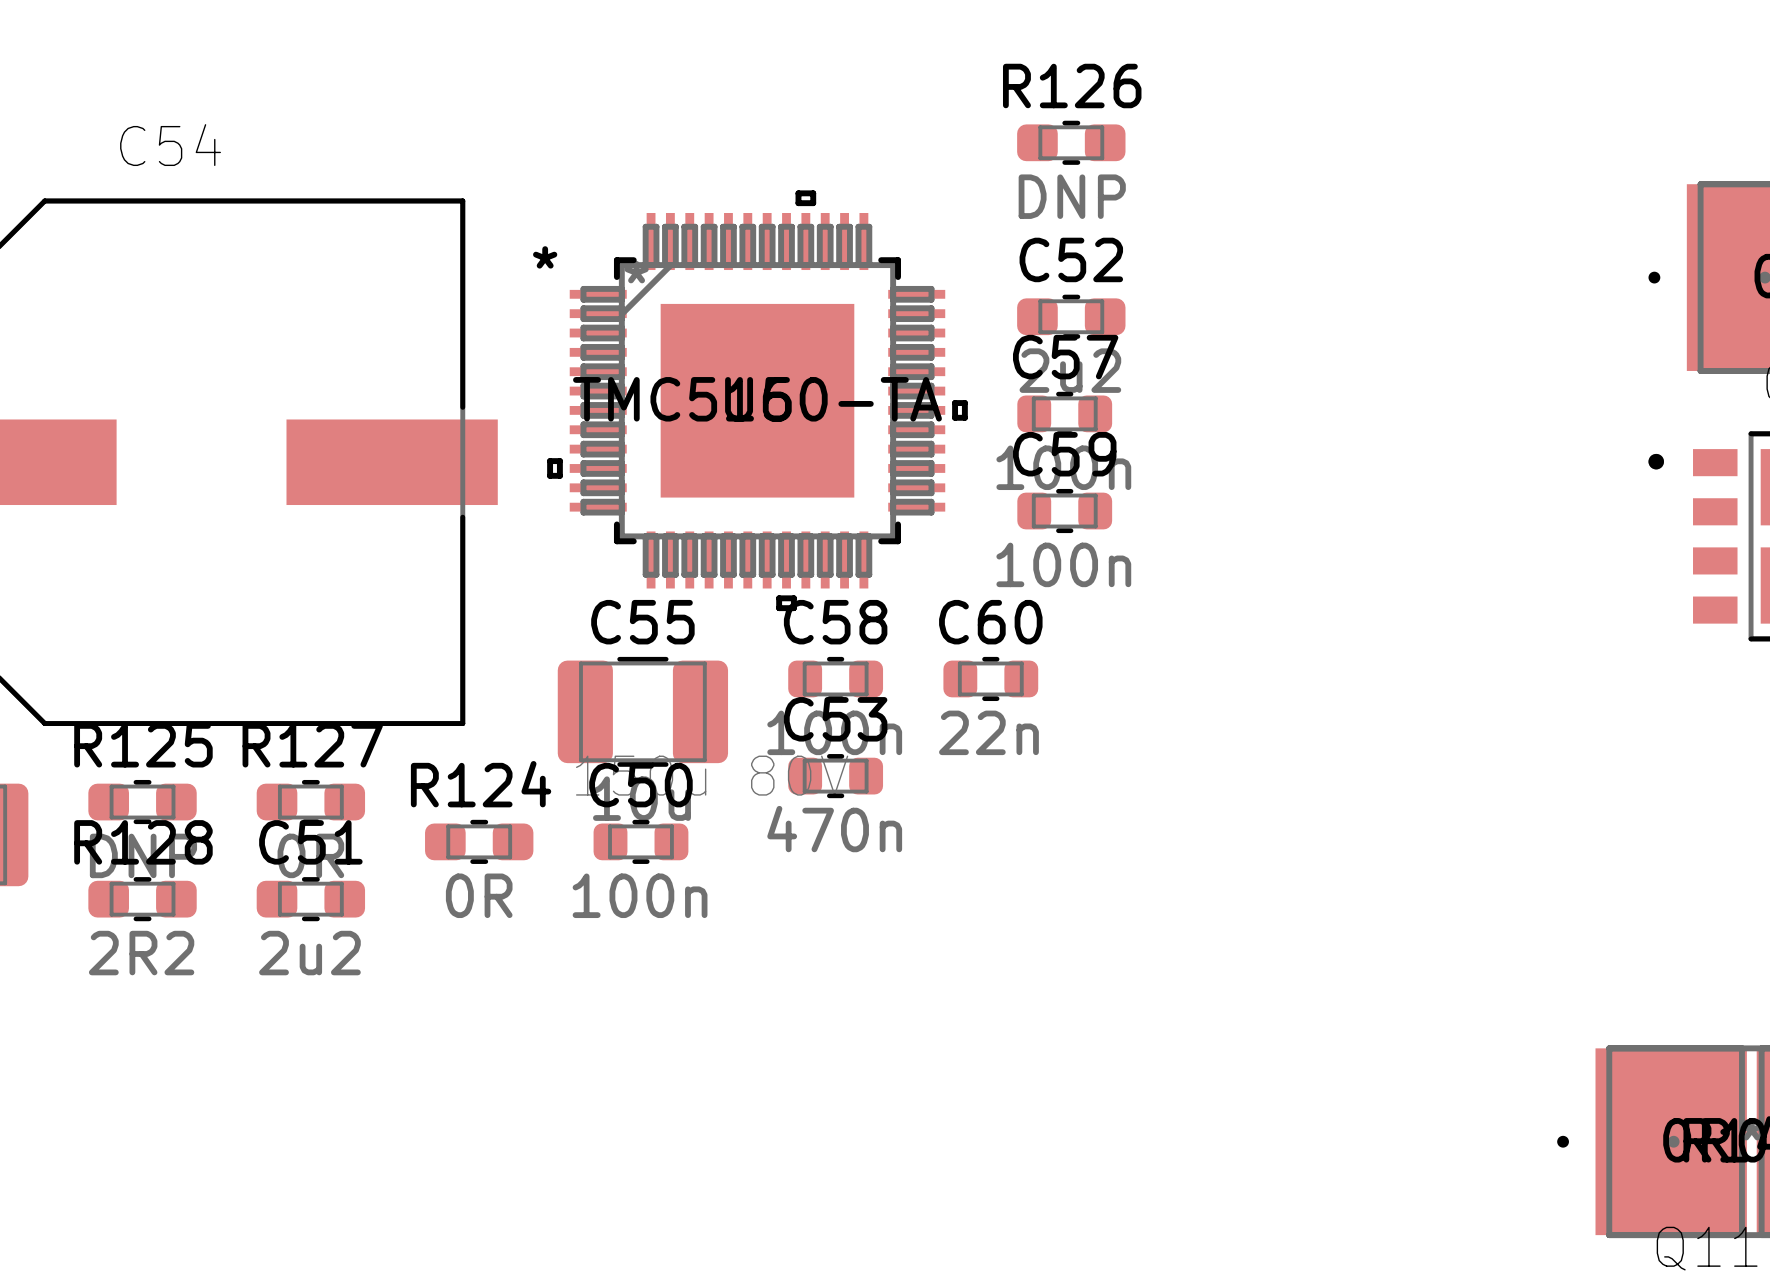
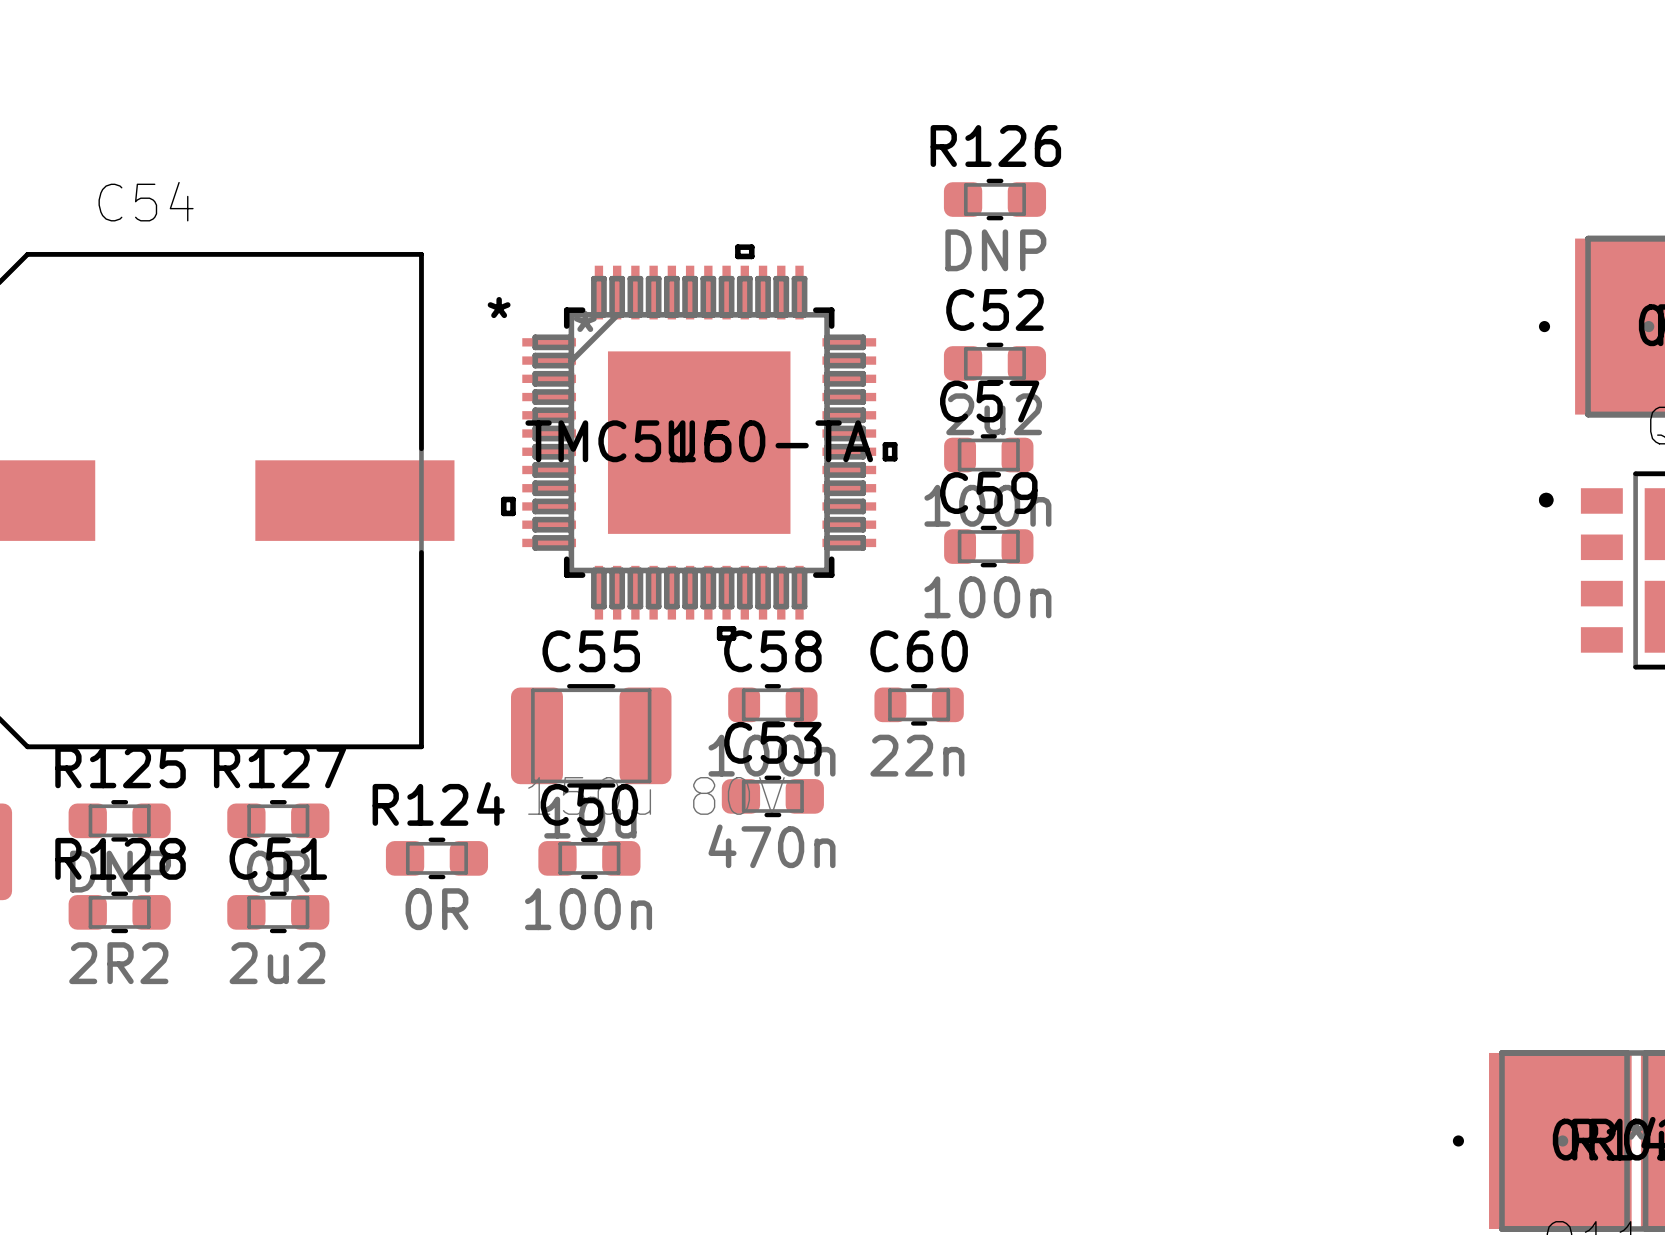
C53 footprint: [788, 754, 884, 799] -> [721, 775, 824, 818]
C50 footprint: [593, 819, 689, 864] -> [538, 837, 641, 880]

